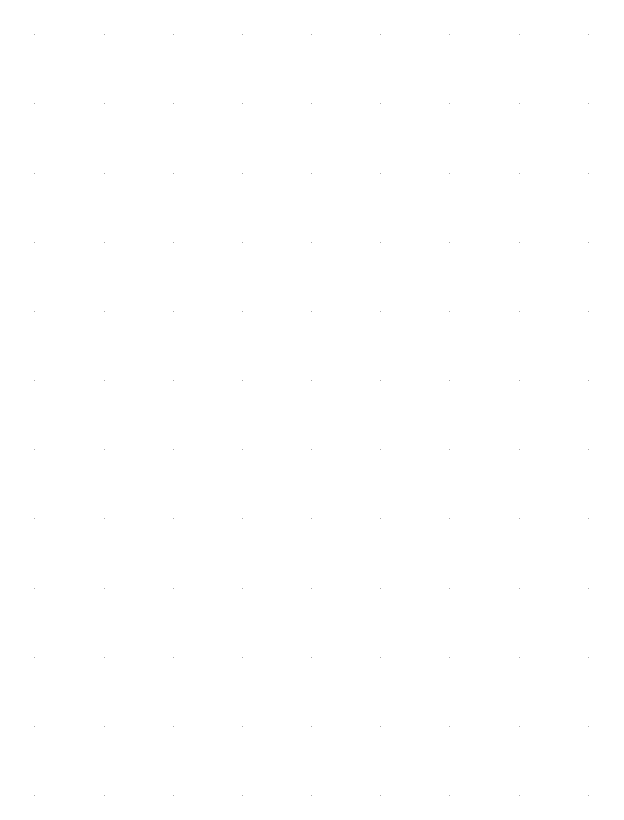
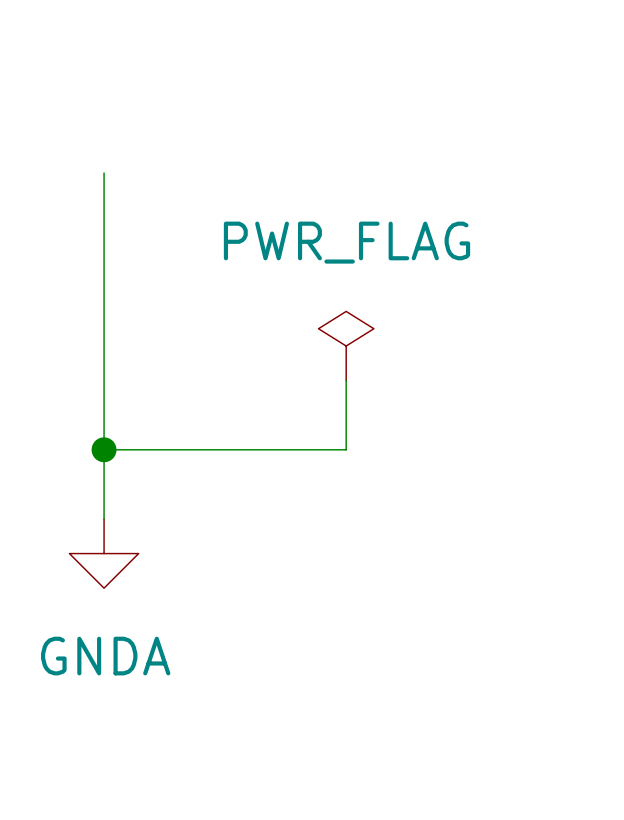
wire: none -> (104, 173) (104, 518)
power symbol: none -> PWR_FLAG (346, 346)
wire: none -> (346, 380) (346, 449) (104, 449)
junction: none -> (104, 449)
power symbol: none -> GNDA (104, 553)

